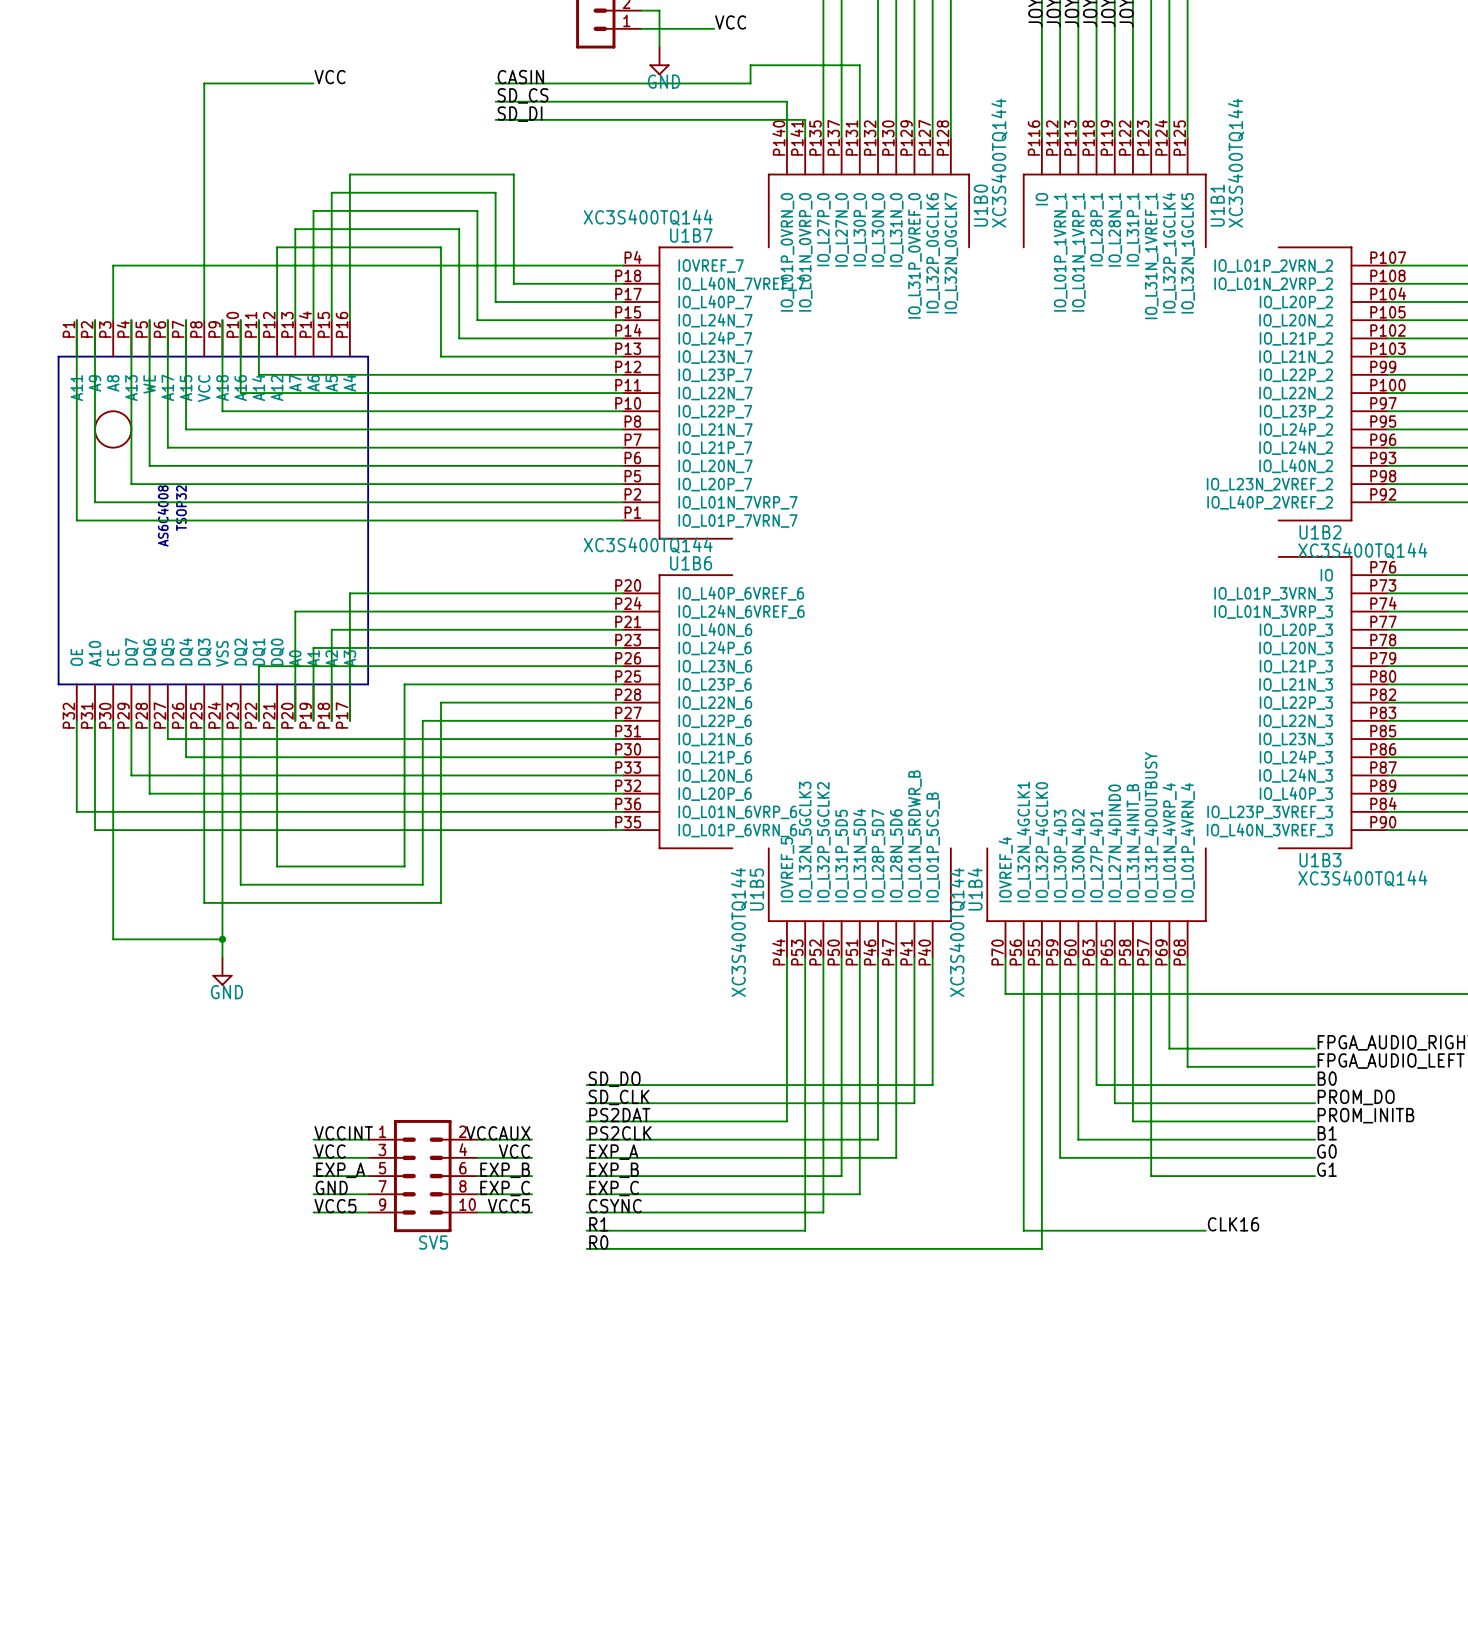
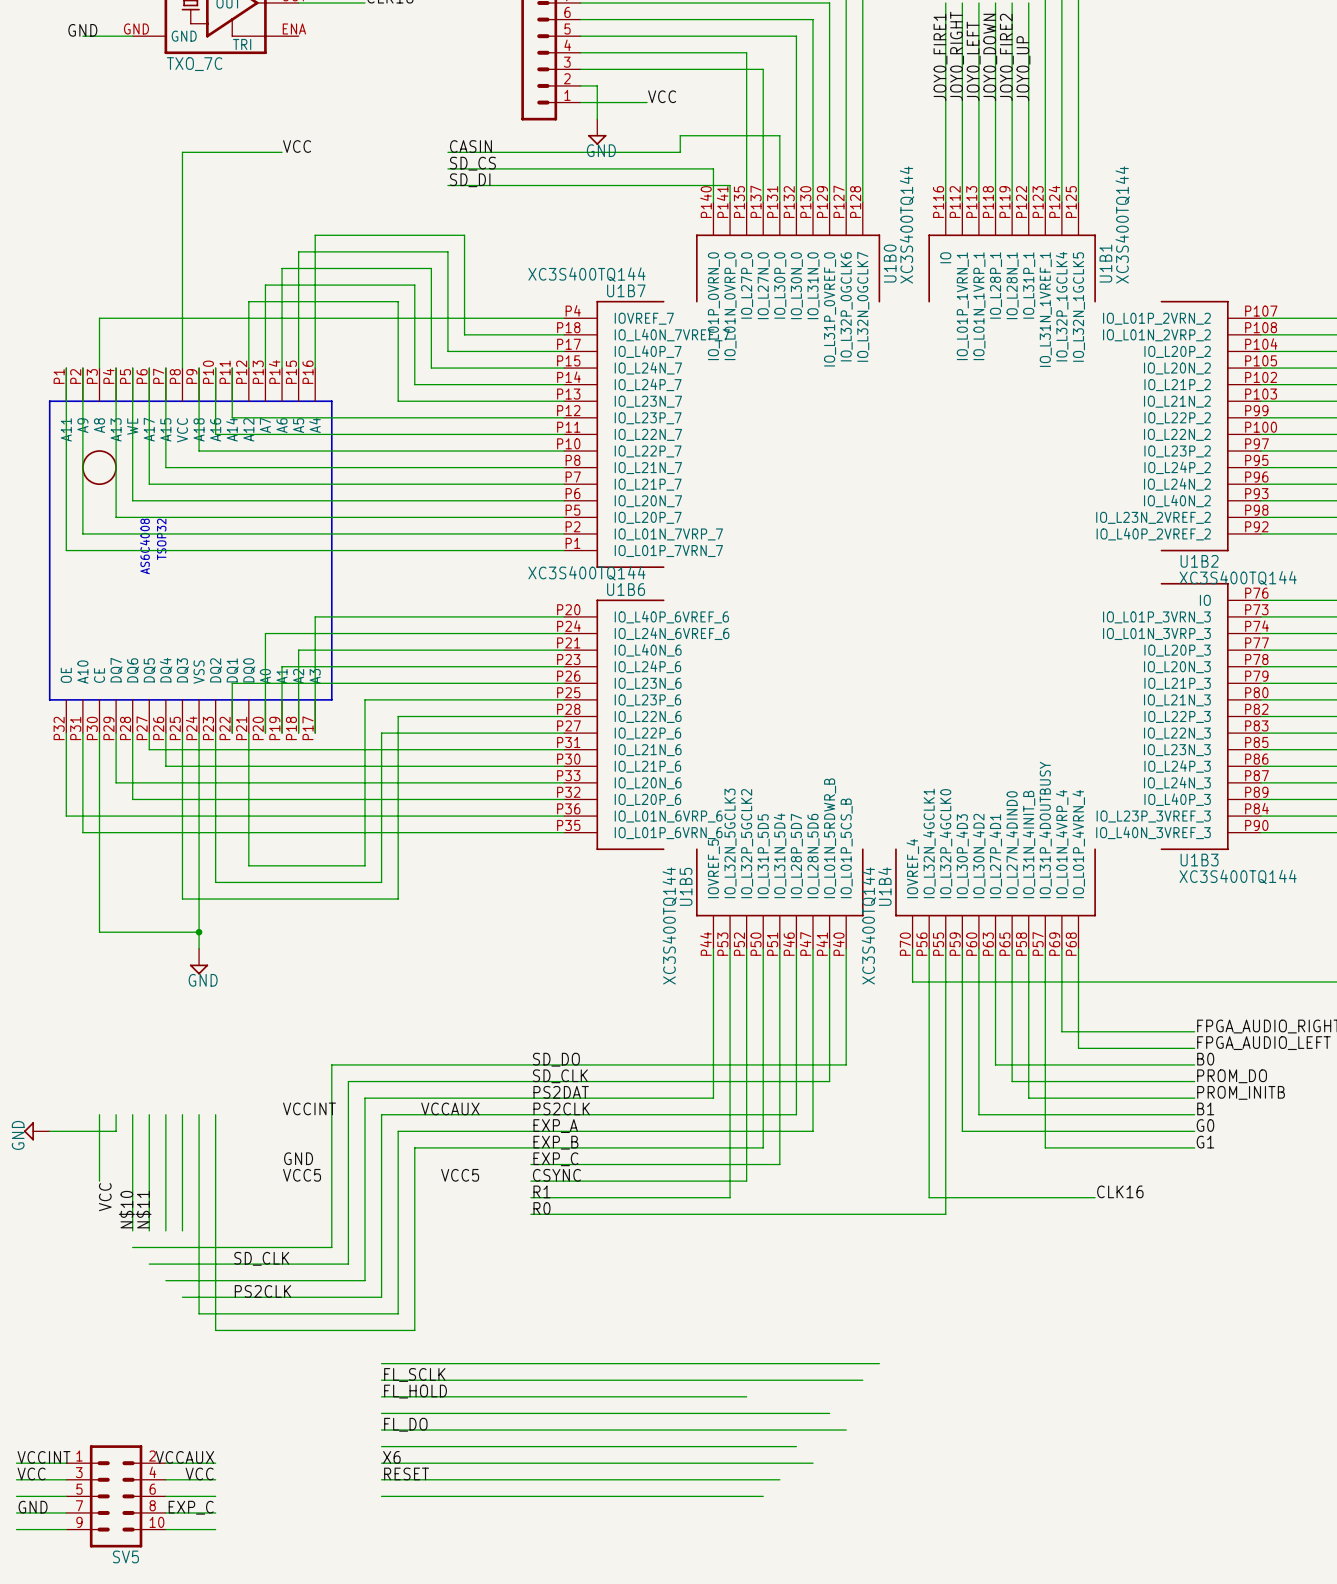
wire: none -> (530, 1064) (331, 1064) (331, 1247) (132, 1247)
wire: none -> (530, 1081) (348, 1081) (348, 1264) (149, 1264)
wire: none -> (530, 1098) (364, 1098) (364, 1280) (165, 1280)
wire: none -> (99, 1114) (99, 1181)
wire: none -> (116, 1114) (116, 1131) (49, 1131)
wire: none -> (132, 1114) (132, 1230)
wire: none -> (149, 1114) (149, 1230)
wire: none -> (165, 1114) (165, 1230)
wire: none -> (182, 1114) (182, 1230)
wire: none -> (199, 1114) (199, 1313) (398, 1313) (398, 1131) (431, 1131)
wire: none -> (215, 1114) (215, 1330) (414, 1330) (414, 1147) (431, 1147)
wire: (313, 1139) (368, 1139) -> none
wire: none -> (431, 1114) (381, 1114) (381, 1297) (182, 1297)
wire: none -> (481, 1114) (530, 1114)
label: VCC (330, 1151) -> none
label: VCC (514, 1151) -> none
power symbol: none -> GND (36, 1131)
wire: (313, 1157) (368, 1157) -> none
label: EXP_A (340, 1170) -> none
label: EXP_B (505, 1170) -> none
wire: (313, 1176) (368, 1176) -> none
SV5 position: (422, 1176) -> (116, 1496)
label: EXP_C (505, 1188) -> none
wire: (313, 1194) (368, 1194) -> none
wire: (477, 1194) (532, 1194) -> (481, 1131) (530, 1131)
wire: (313, 1212) (368, 1212) -> none
wire: (477, 1212) (532, 1212) -> (481, 1147) (530, 1147)
label: none -> VCC (105, 1197)
label: none -> N$10 (126, 1209)
label: none -> N$11 (143, 1209)
label: none -> SD_CLK (261, 1258)
label: none -> PS2CLK (262, 1291)
wire: none -> (381, 1363) (879, 1363)
label: none -> FL_SCLK (414, 1374)
wire: none -> (381, 1380) (862, 1380)
label: none -> FL_HOLD (415, 1391)
wire: none -> (381, 1396) (746, 1396)
wire: none -> (381, 1413) (829, 1413)
label: none -> FL_DO (405, 1424)
wire: none -> (381, 1430) (846, 1430)
wire: none -> (381, 1446) (796, 1446)
label: none -> VCCINT (44, 1457)
label: none -> VCCAUX (184, 1457)
label: none -> X6 (391, 1457)
wire: none -> (16, 1463) (66, 1463)
wire: none -> (165, 1463) (215, 1463)
wire: none -> (381, 1463) (813, 1463)
label: none -> VCC (31, 1473)
label: none -> VCC (199, 1473)
label: none -> RESET (406, 1473)
wire: none -> (16, 1479) (66, 1479)
wire: none -> (165, 1479) (215, 1479)
wire: none -> (381, 1479) (779, 1479)
wire: none -> (16, 1496) (66, 1496)
wire: none -> (165, 1496) (215, 1496)
wire: none -> (381, 1496) (763, 1496)
label: none -> GND (33, 1507)
label: none -> EXP_C (191, 1507)
wire: none -> (16, 1512) (66, 1512)
wire: none -> (165, 1512) (215, 1512)
wire: none -> (16, 1529) (66, 1529)
wire: none -> (165, 1529) (215, 1529)

